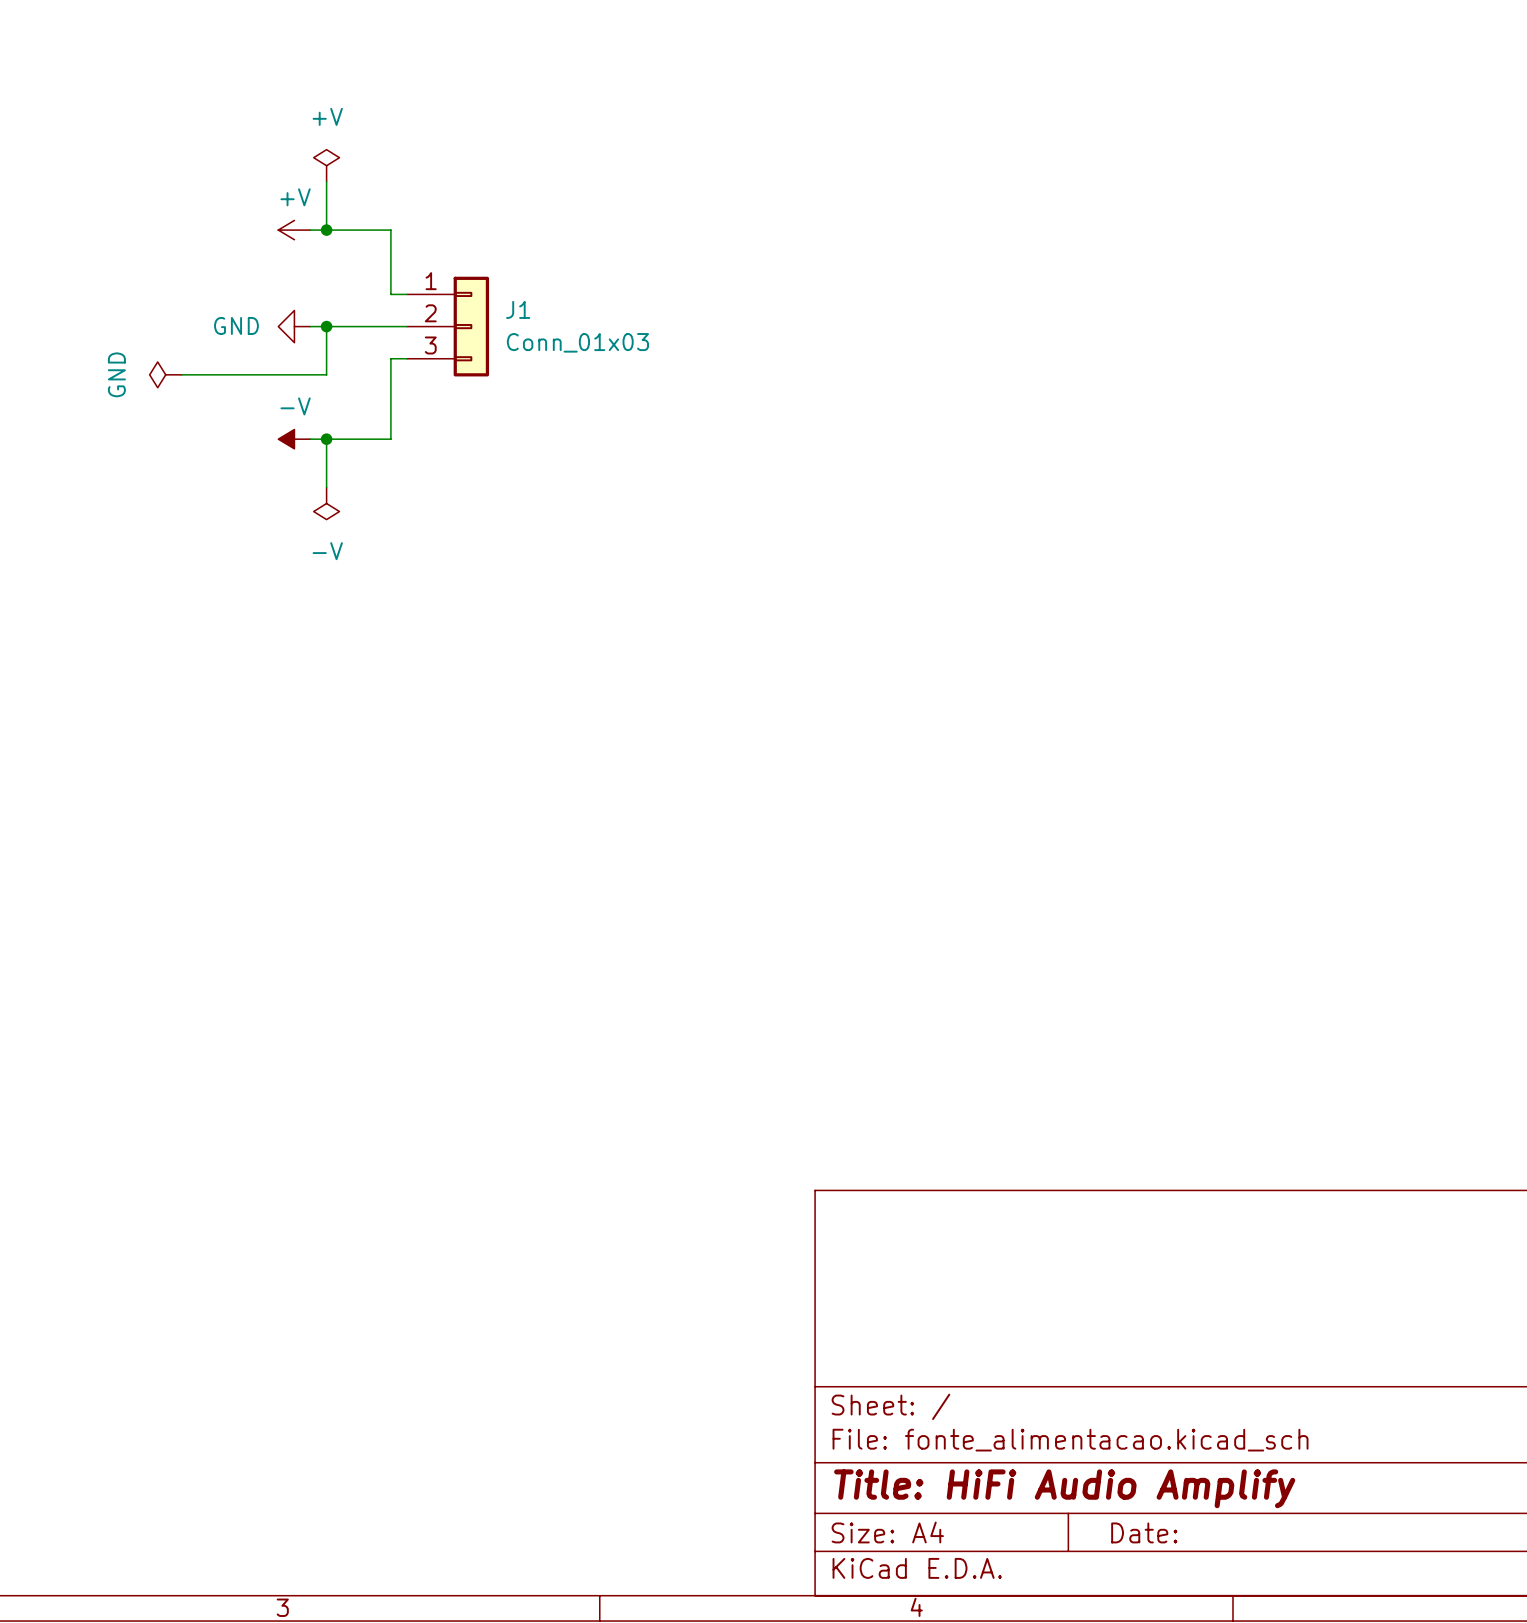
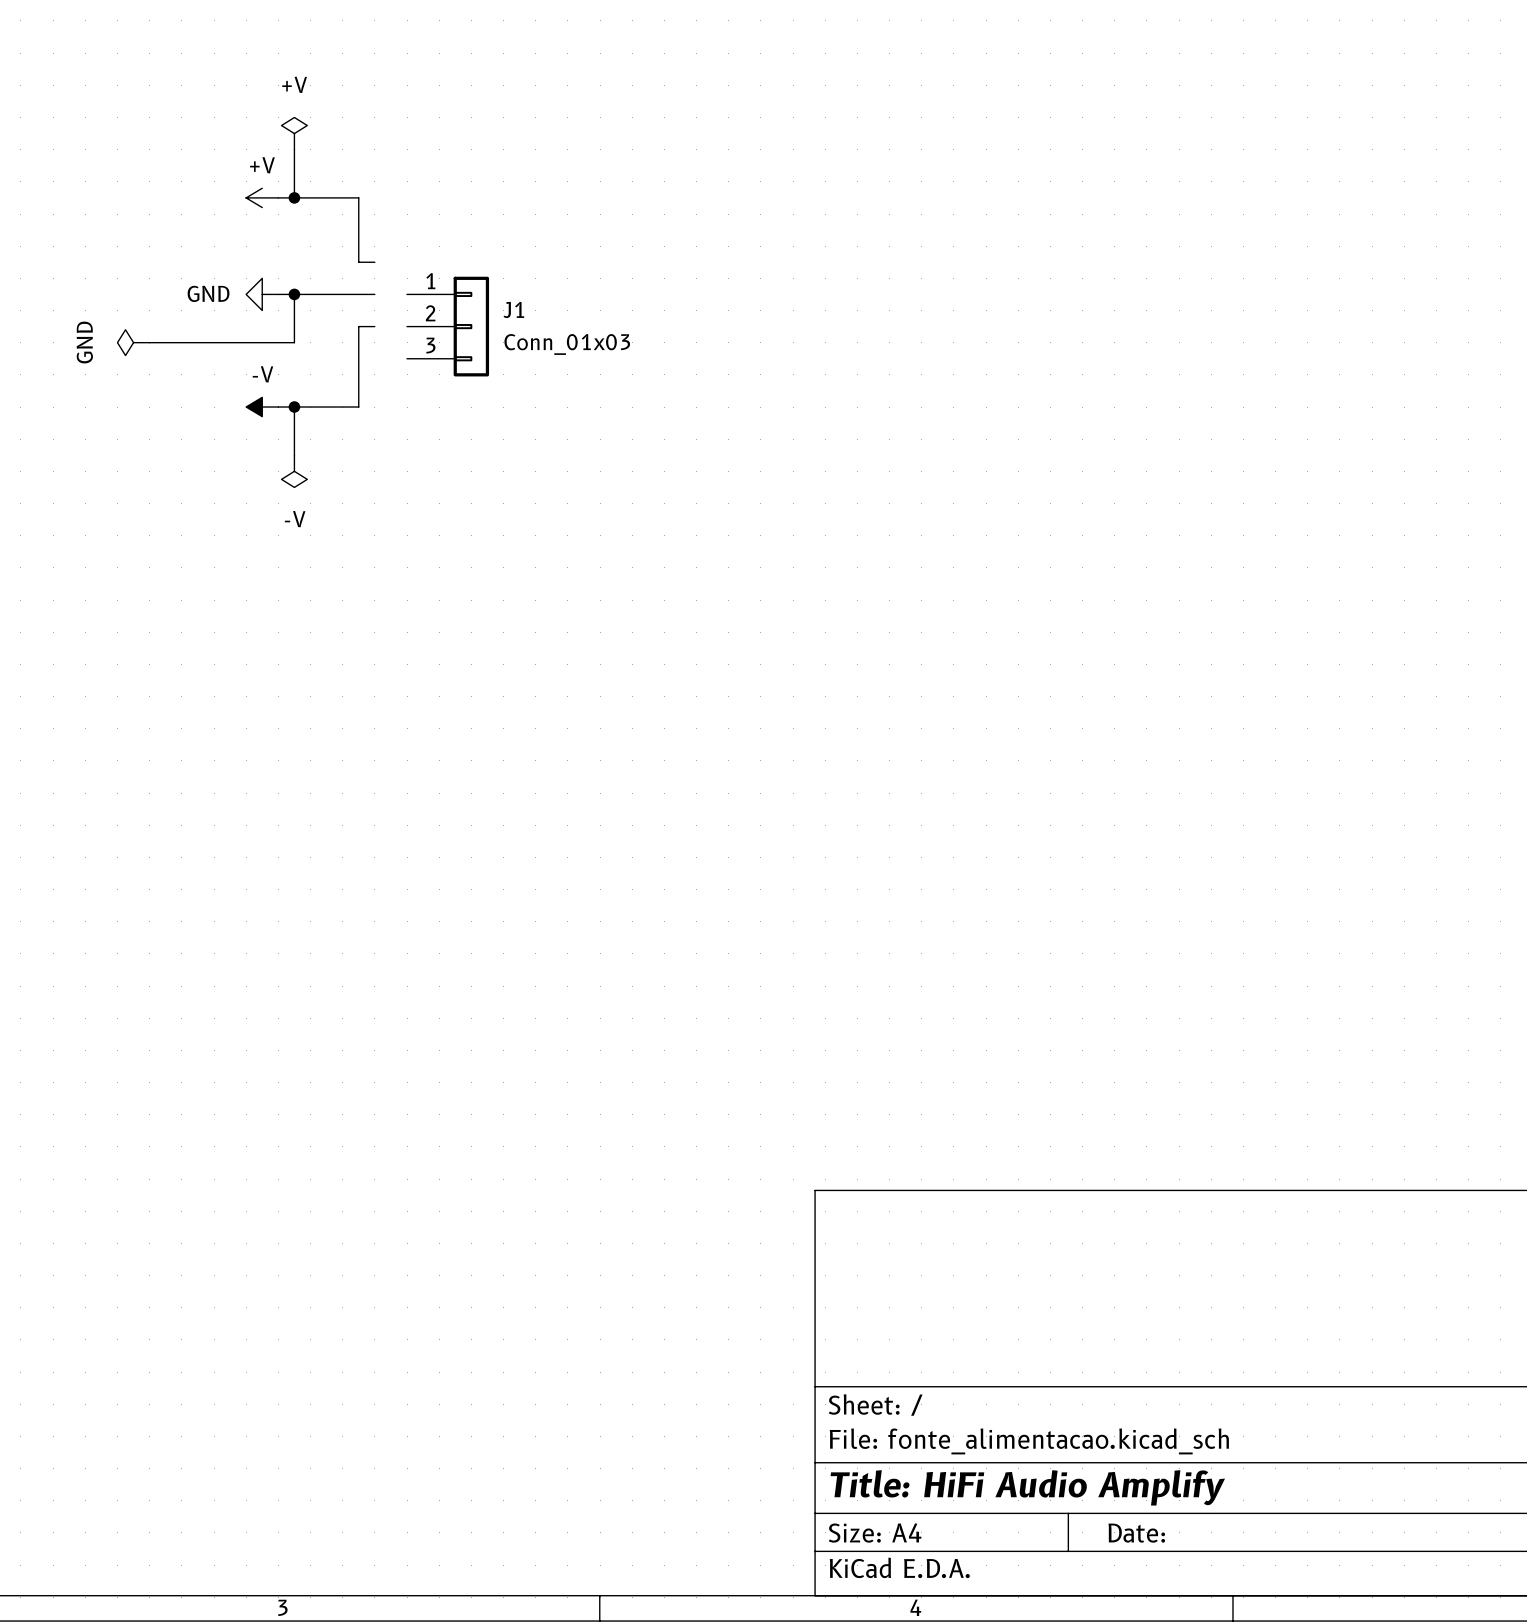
power symbol position: +V (326, 165) -> +V (294, 133)
wire: (326, 181) (326, 230) -> (294, 149) (294, 197)
junction: none -> (294, 197)
power symbol position: +V (294, 230) -> +V (262, 197)
wire: (310, 230) (390, 230) (390, 294) (407, 294) -> (278, 197) (358, 197) (358, 262) (374, 262)
junction: (326, 230) -> none
wire: none -> (278, 294) (374, 294)
junction: none -> (294, 294)
power symbol position: GND (294, 326) -> GND (262, 294)
wire: (310, 326) (358, 326) -> (278, 407) (358, 407) (358, 326)
wire: (326, 326) (326, 374) (181, 374) -> (294, 294) (294, 342) (149, 342)
junction: (326, 326) -> none
wire: (374, 326) (407, 326) -> none
wire: (407, 358) (390, 358) (390, 439) (310, 439) -> none
power symbol position: GND (165, 374) -> GND (133, 342)
junction: none -> (294, 407)
power symbol position: -V (294, 439) -> -V (262, 407)
wire: (326, 439) (326, 487) -> (294, 407) (294, 455)
junction: (326, 439) -> none
power symbol position: -V (326, 503) -> -V (294, 471)

